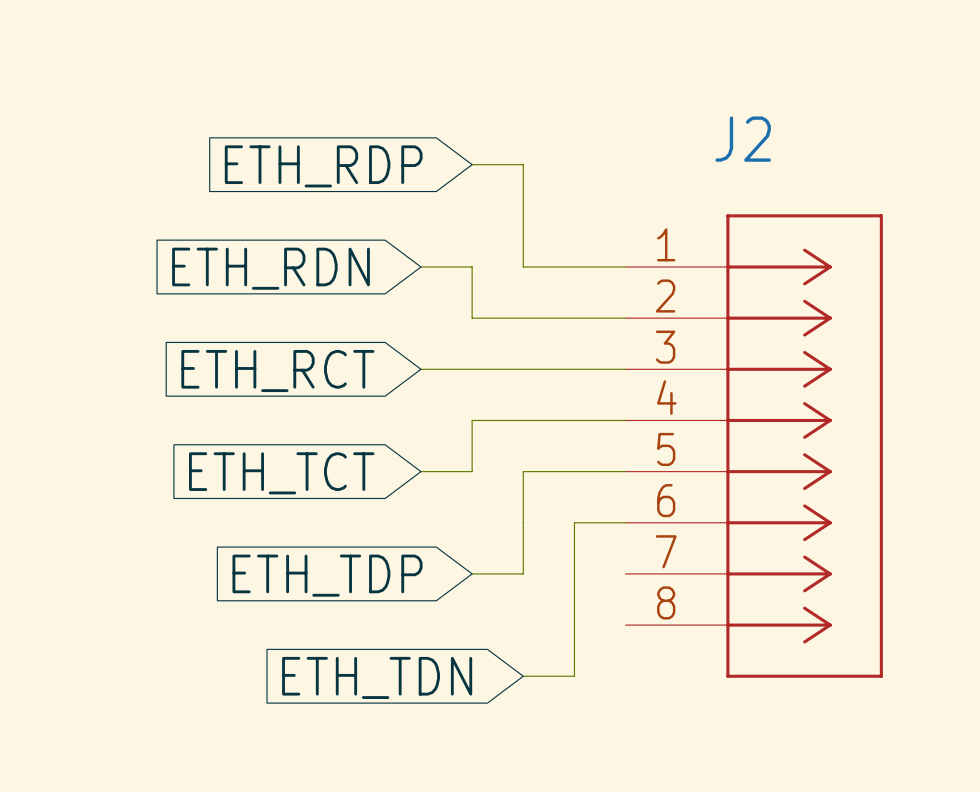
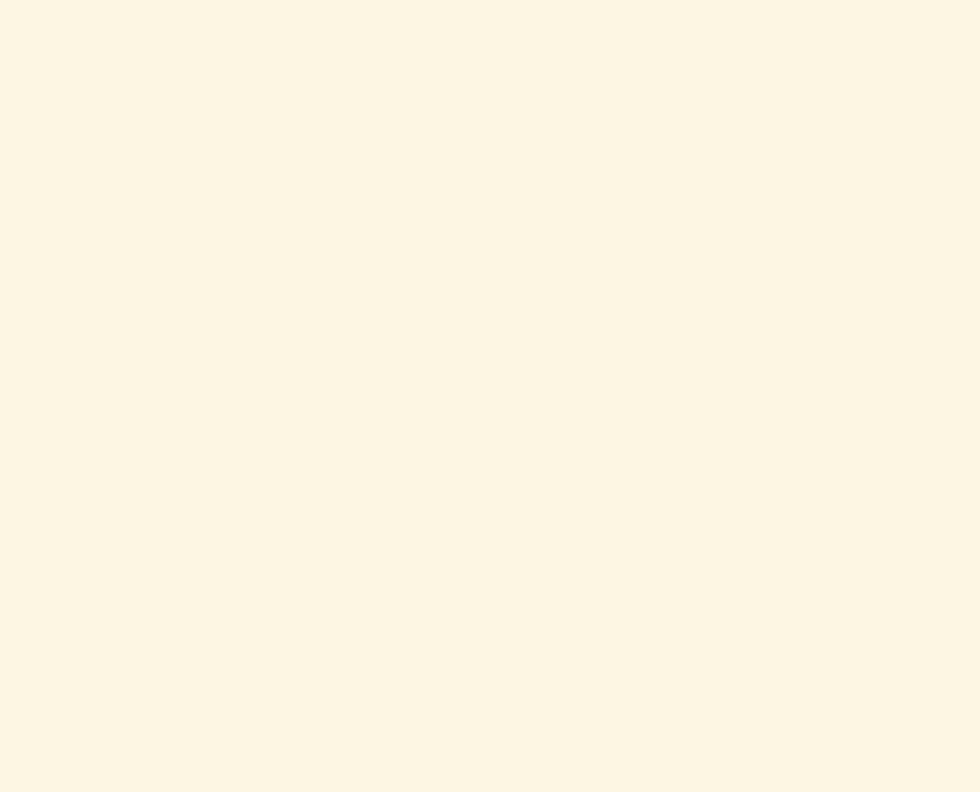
wire: (472, 164) (523, 164) (523, 267) (625, 267) -> none
global label: ETH_RDP (323, 166) -> none
wire: (420, 267) (472, 267) (472, 318) (625, 318) -> none
global label: ETH_RDN (270, 268) -> none
wire: (420, 369) (625, 369) -> none
global label: ETH_RCT (277, 371) -> none
wire: (625, 420) (472, 420) (472, 471) (420, 471) -> none
J2: (754, 446) -> none
wire: (625, 471) (523, 471) (523, 573) (472, 573) -> none
global label: ETH_TCT (281, 473) -> none
wire: (625, 522) (574, 522) (574, 676) (523, 676) -> none
global label: ETH_TDP (327, 575) -> none
global label: ETH_TDN (377, 677) -> none

